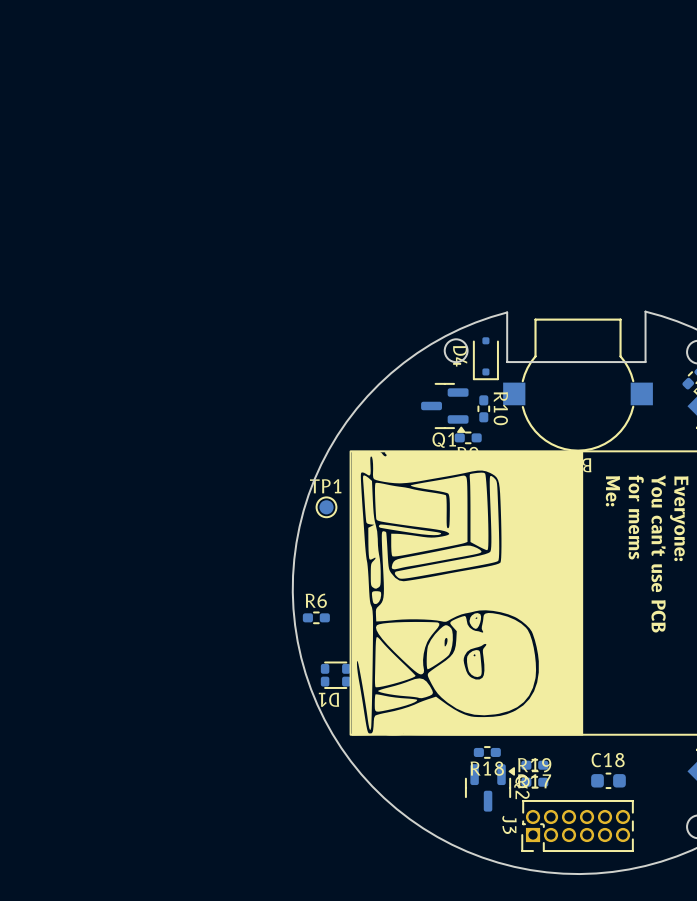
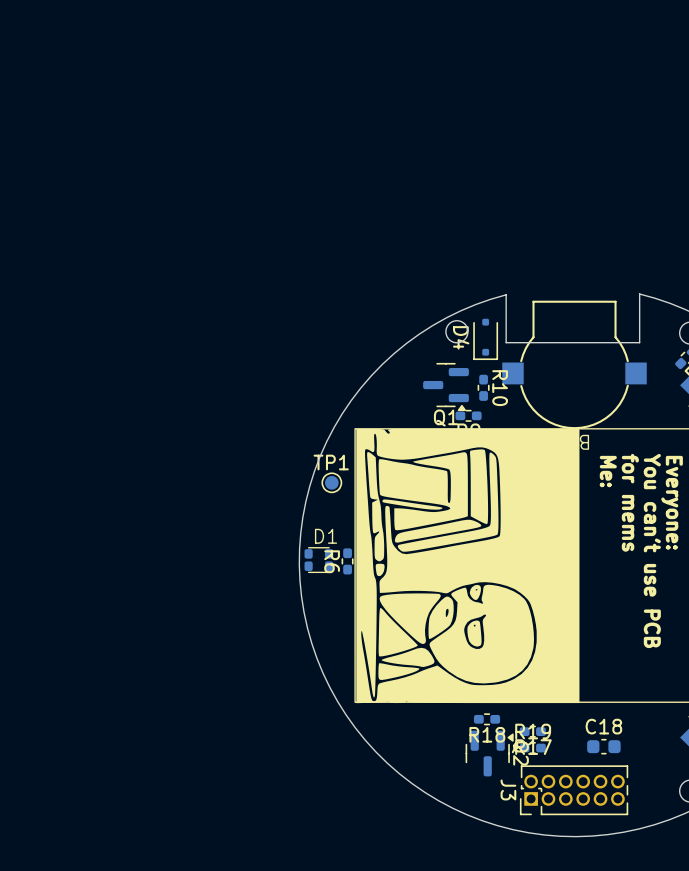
R6 rotation: 0° (316, 617) -> 90° clockwise (347, 561)
R6 position: (316, 617) -> (347, 561)
D1 position: (335, 675) -> (318, 560)
D1 name rotation: 0° (328, 699) -> 180° (326, 536)
D1 name position: D1 (328, 699) -> D1 (326, 536)

